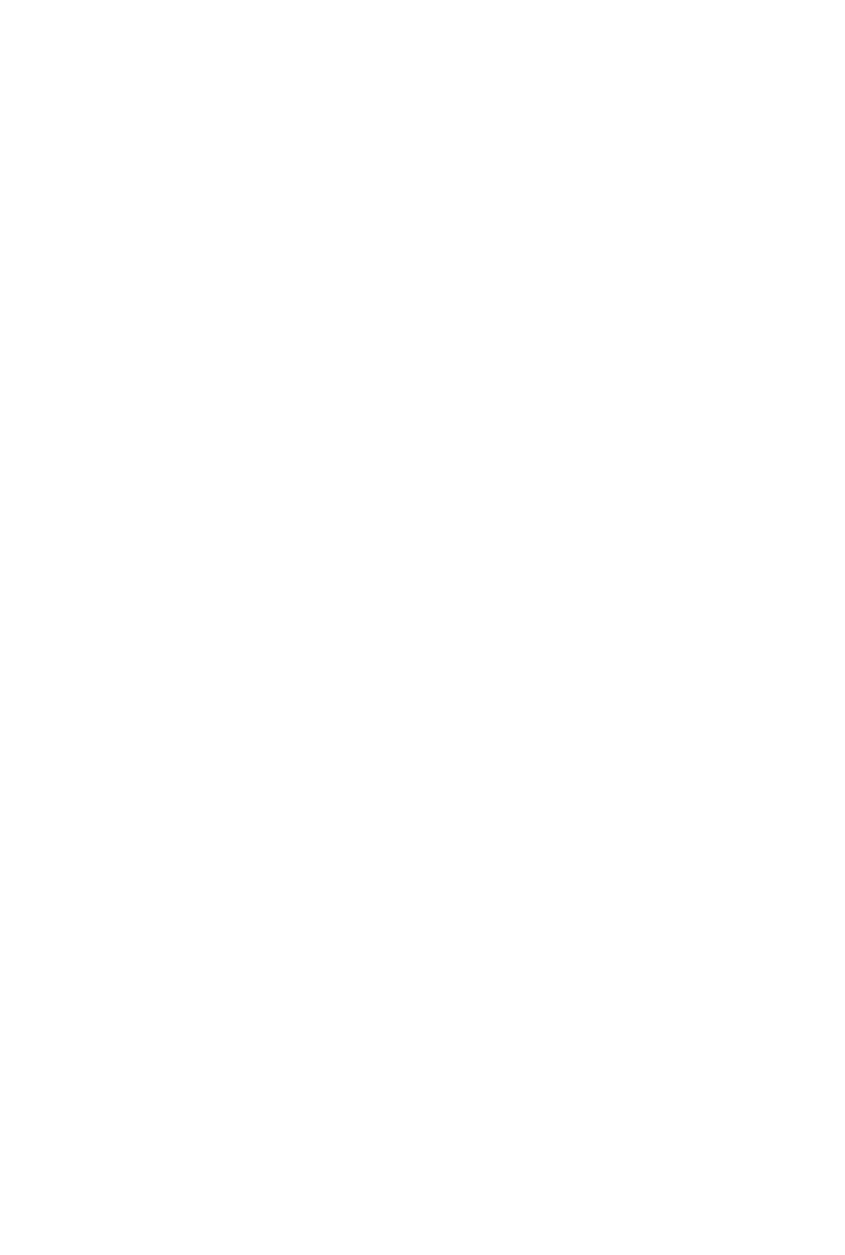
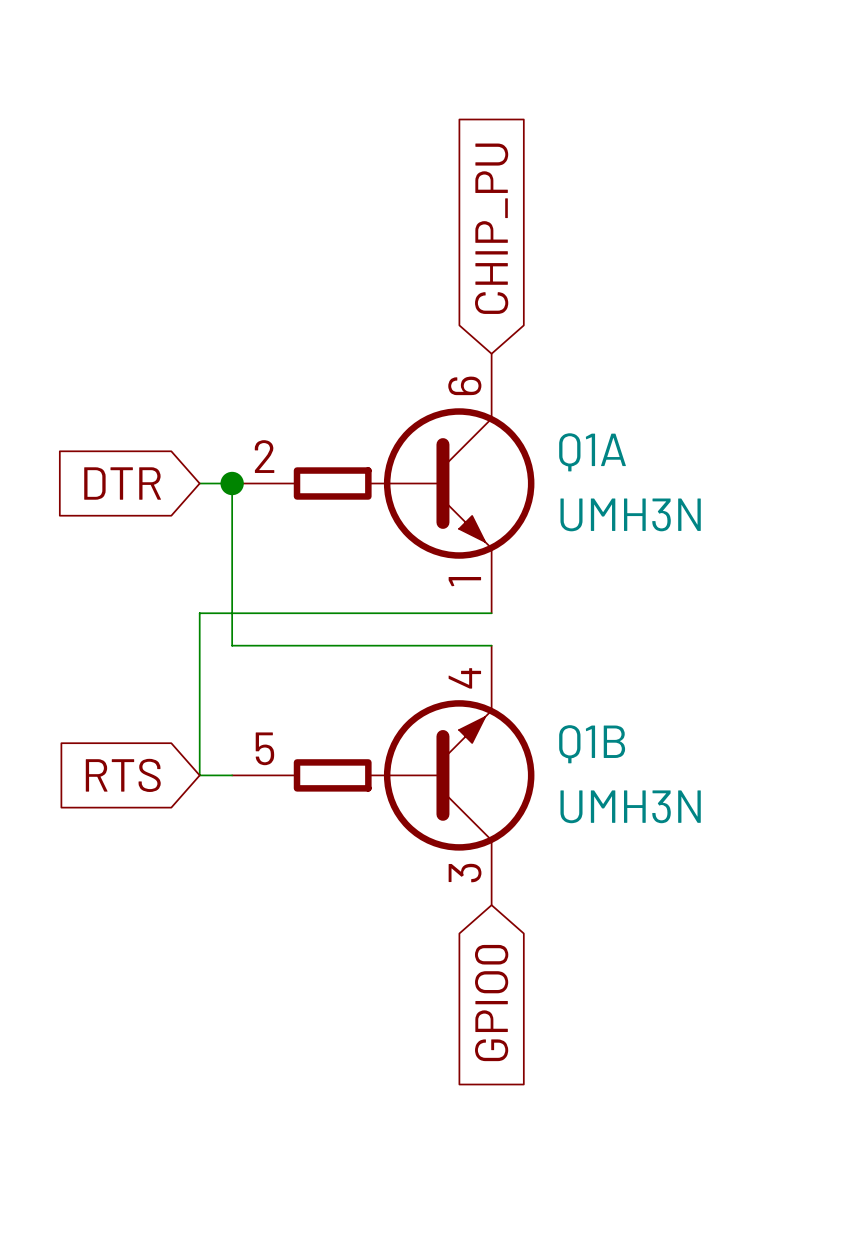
global label: none -> CHIP_PU (491, 228)
global label: none -> DTR (122, 483)
wire: none -> (199, 483) (232, 483) (232, 645) (491, 645)
junction: none -> (232, 483)
Q1A: none -> UMH3N (383, 483)
wire: none -> (491, 613) (199, 613) (199, 775) (232, 775)
global label: none -> RTS (123, 775)
Q1B: none -> UMH3N (383, 775)
global label: none -> GPIO0 (491, 1003)

